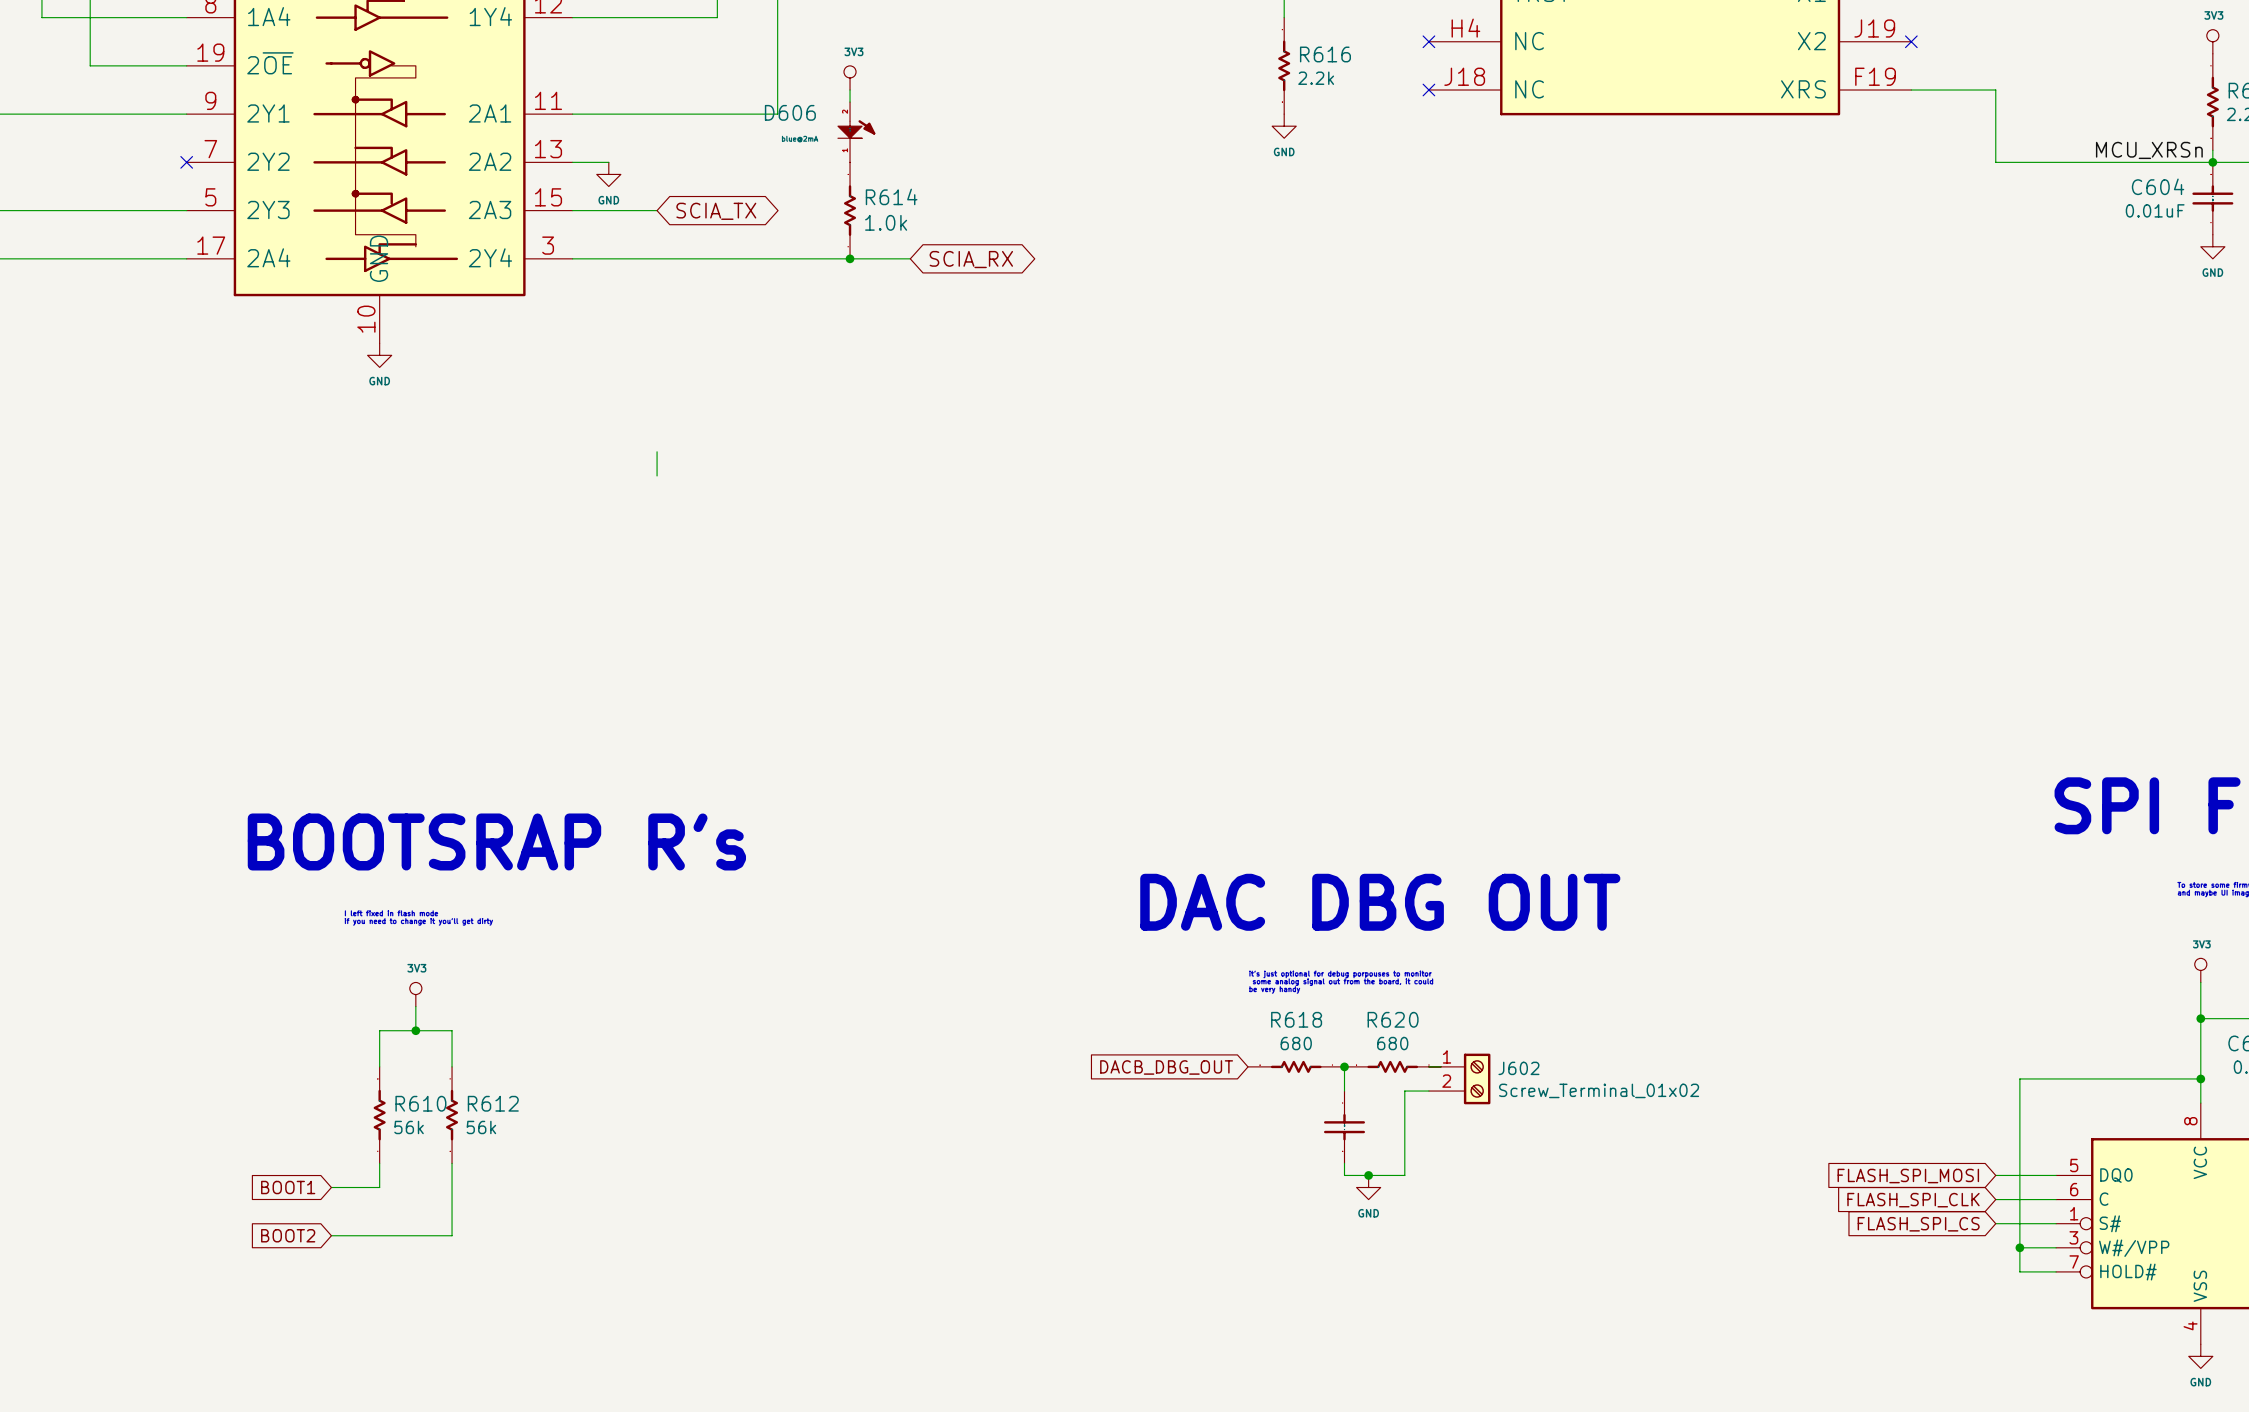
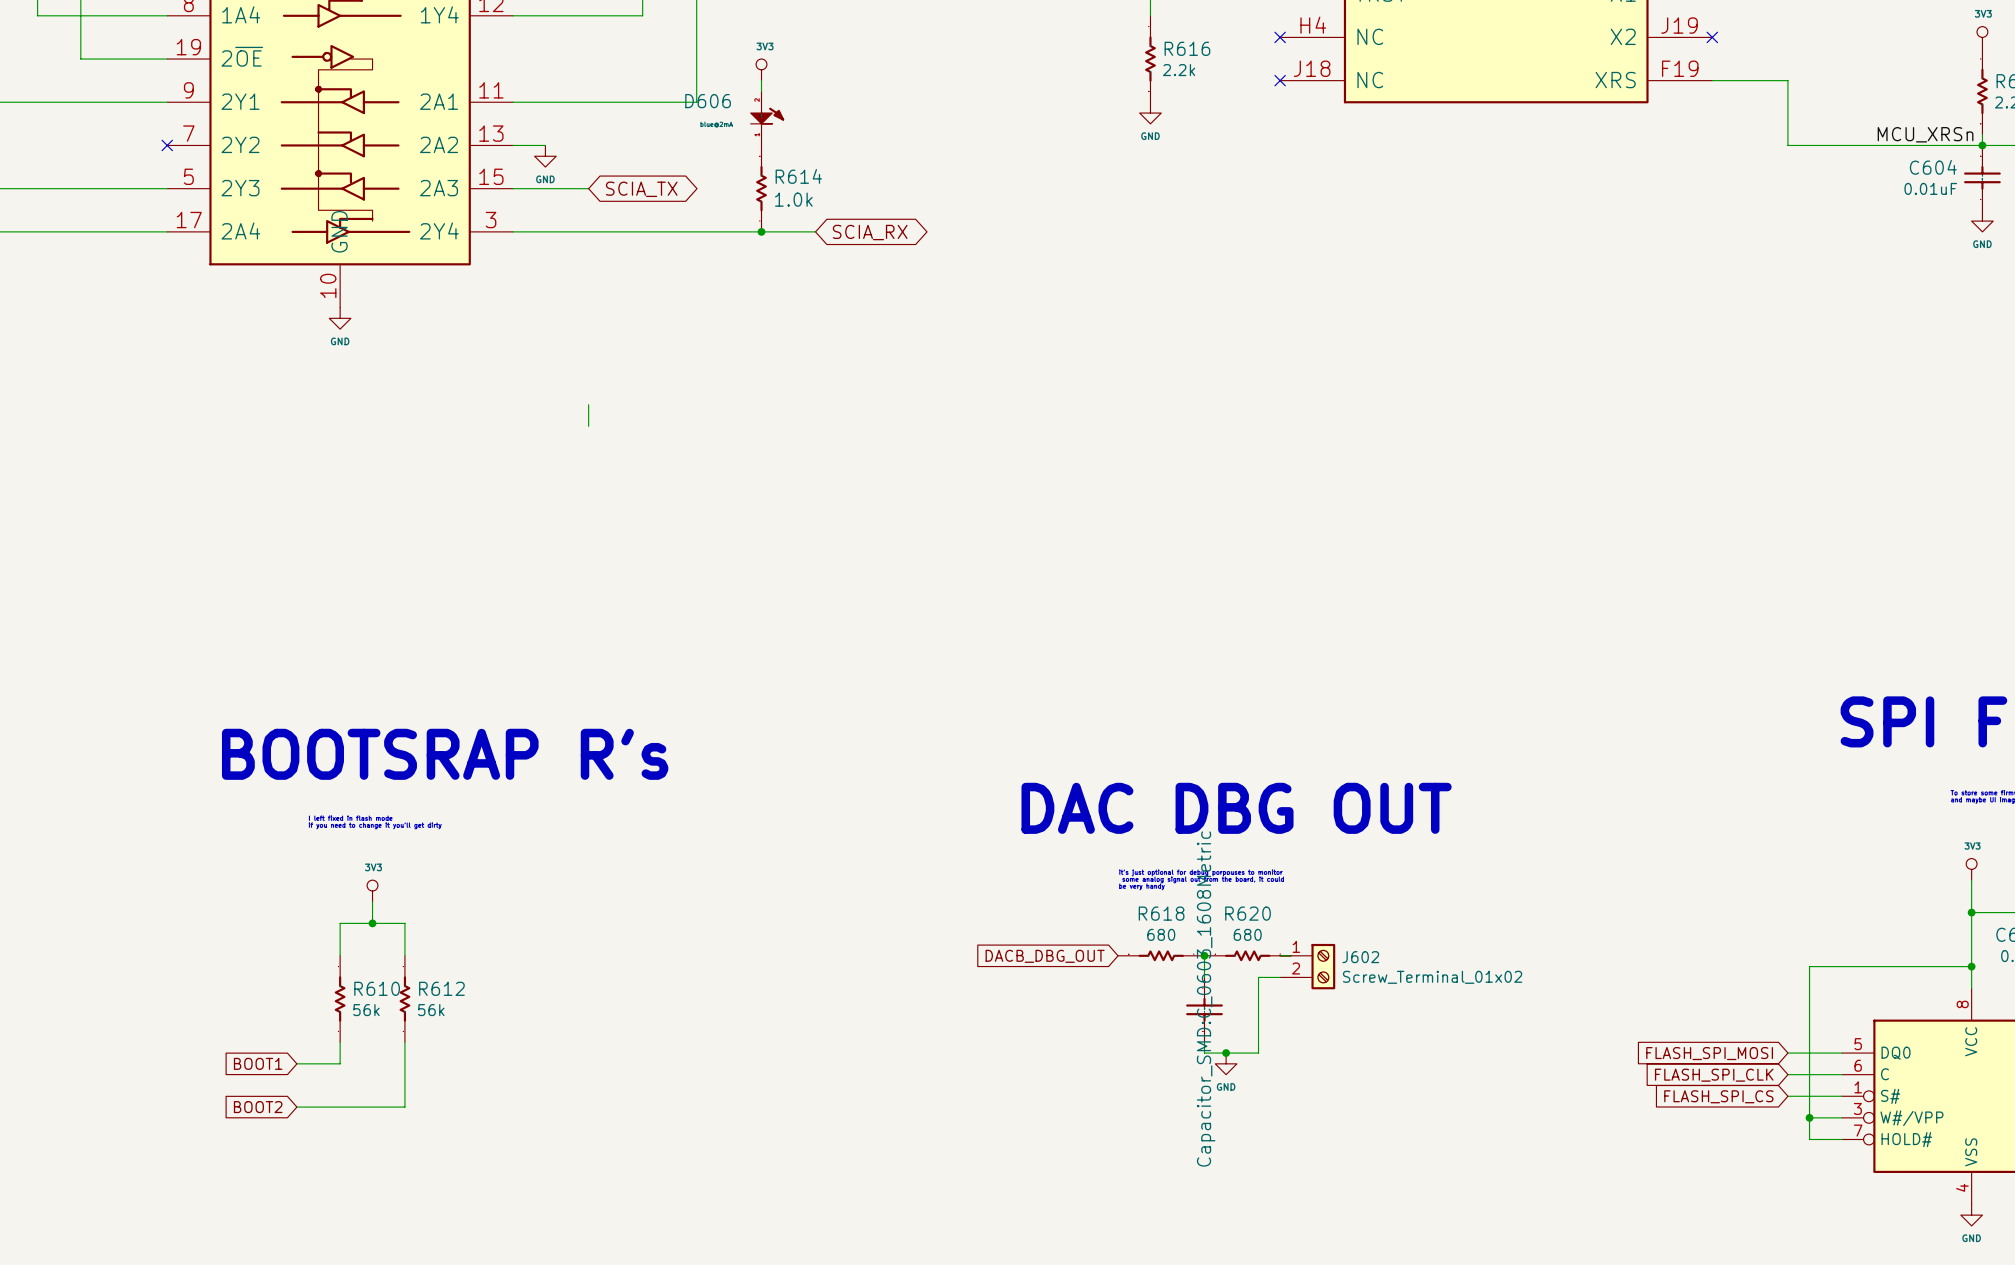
part text: none -> Capacitor_SMD:C_0603_1608Metric (1206, 999)

